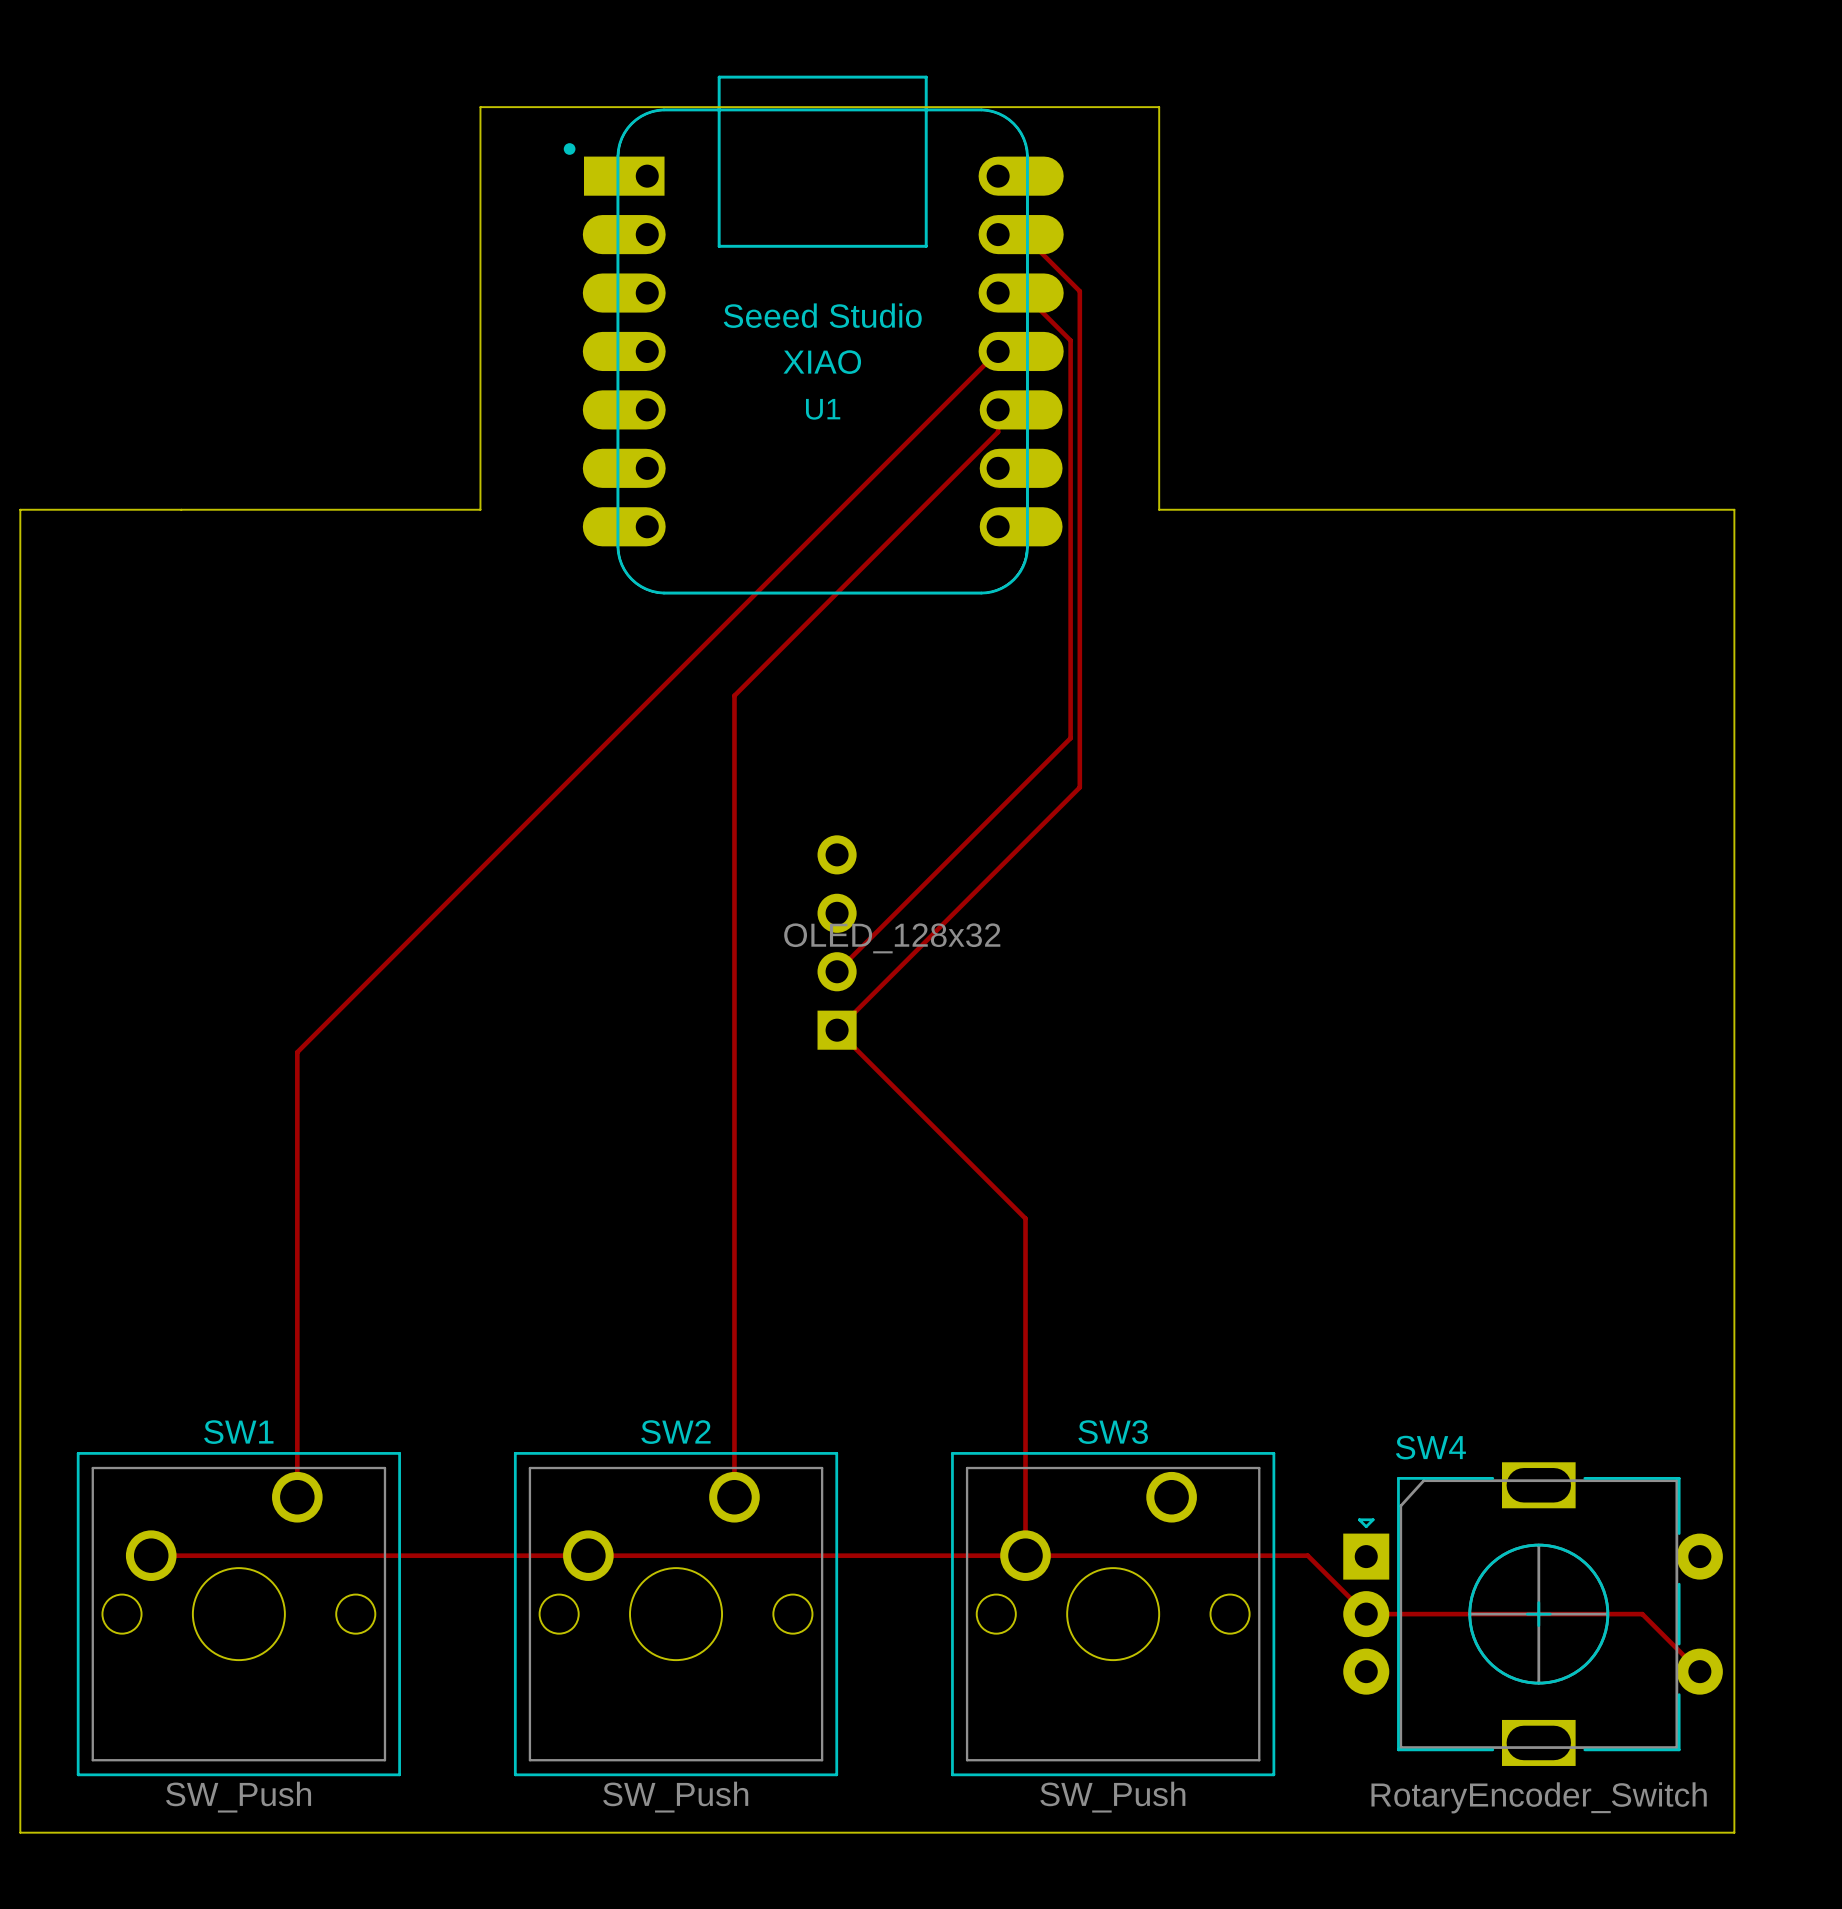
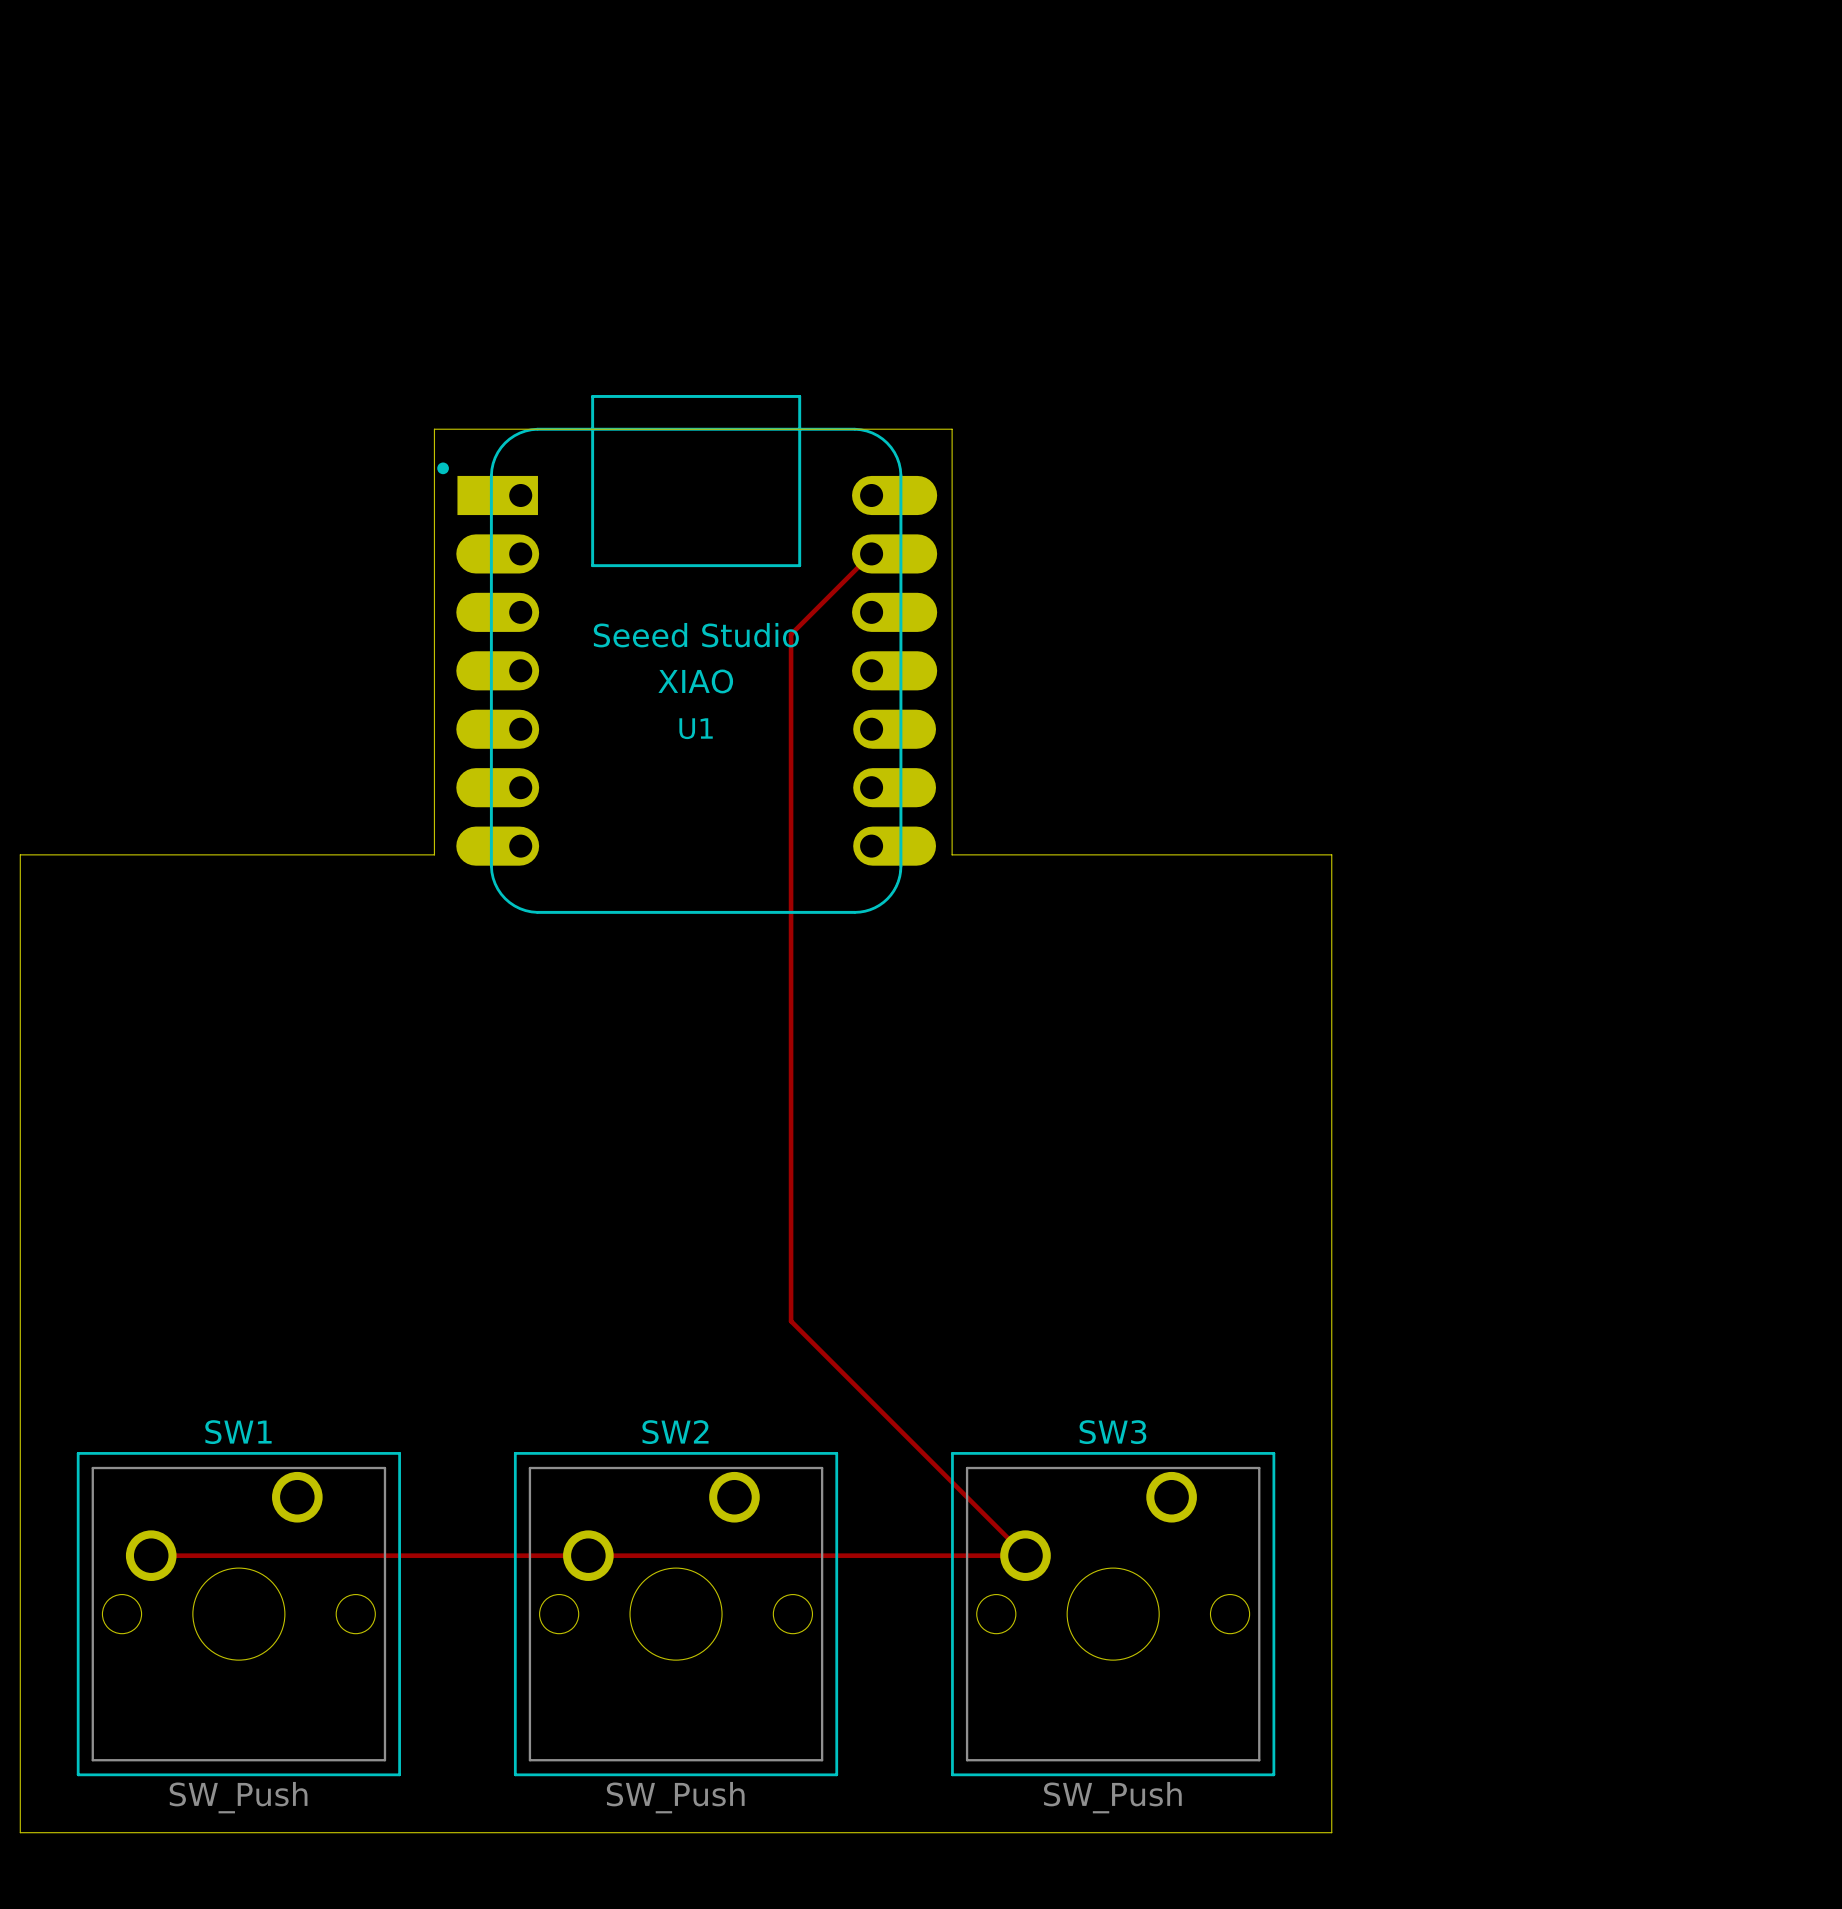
track: (998, 234) (1023, 234) (1079, 291) (1079, 787) (837, 1030) (1025, 1218) (1025, 1555) (1307, 1555) (1366, 1614) (1642, 1614) (1699, 1671) -> none
track: (998, 293) (1023, 293) (1070, 340) (1070, 738) (837, 971) -> none
U1 position: (813, 335) -> (687, 654)
track: (998, 351) (297, 1052) (297, 1497) -> none
track: (998, 409) (998, 432) (734, 695) (734, 1497) -> none
track: none -> (871, 553) (791, 634) (791, 1321) (1025, 1555)
board edge: (20, 854) (20, 509) (480, 509) (480, 107) (1159, 107) (1159, 509) (1734, 509) (1734, 1832) (1331, 1832) -> (20, 854) (434, 854) (434, 429) (952, 429) (952, 854) (1331, 854) (1331, 1832)
part: OLED_128x32 (837, 942) -> none
SW4: RotaryEncoder_Switch (1533, 1614) -> none

